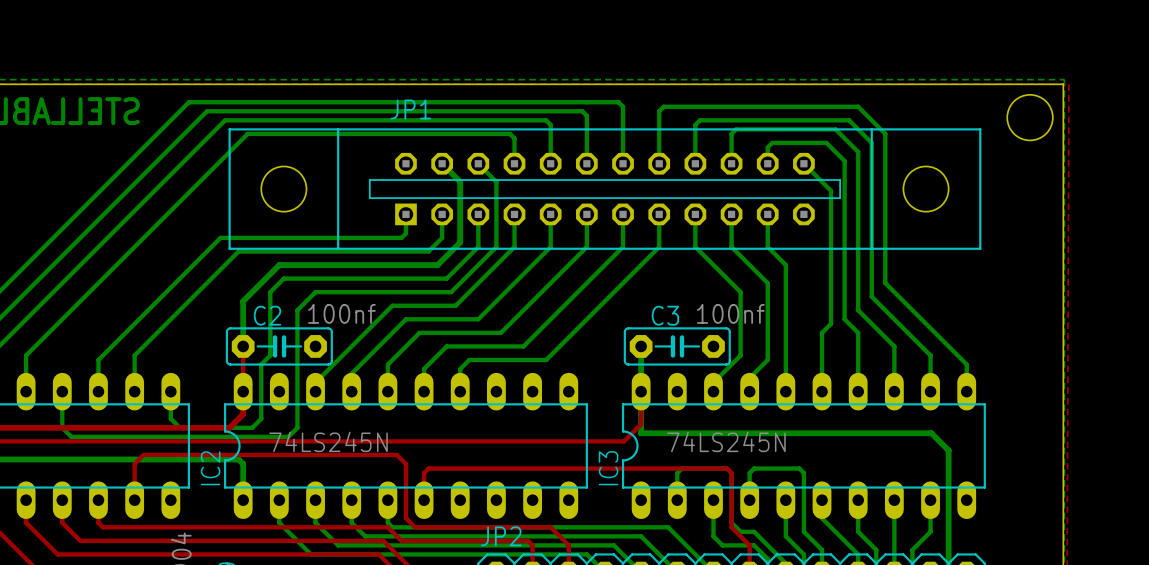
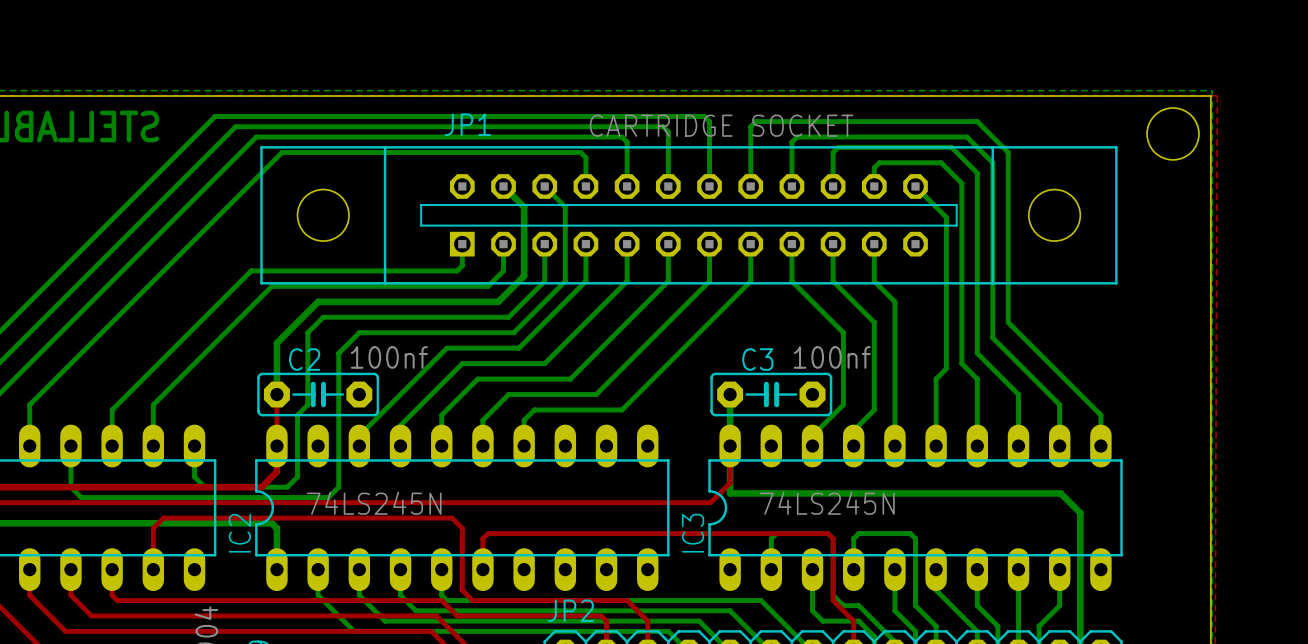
JP1 value: none -> CARTRIDGE SOCKET (721, 125)

